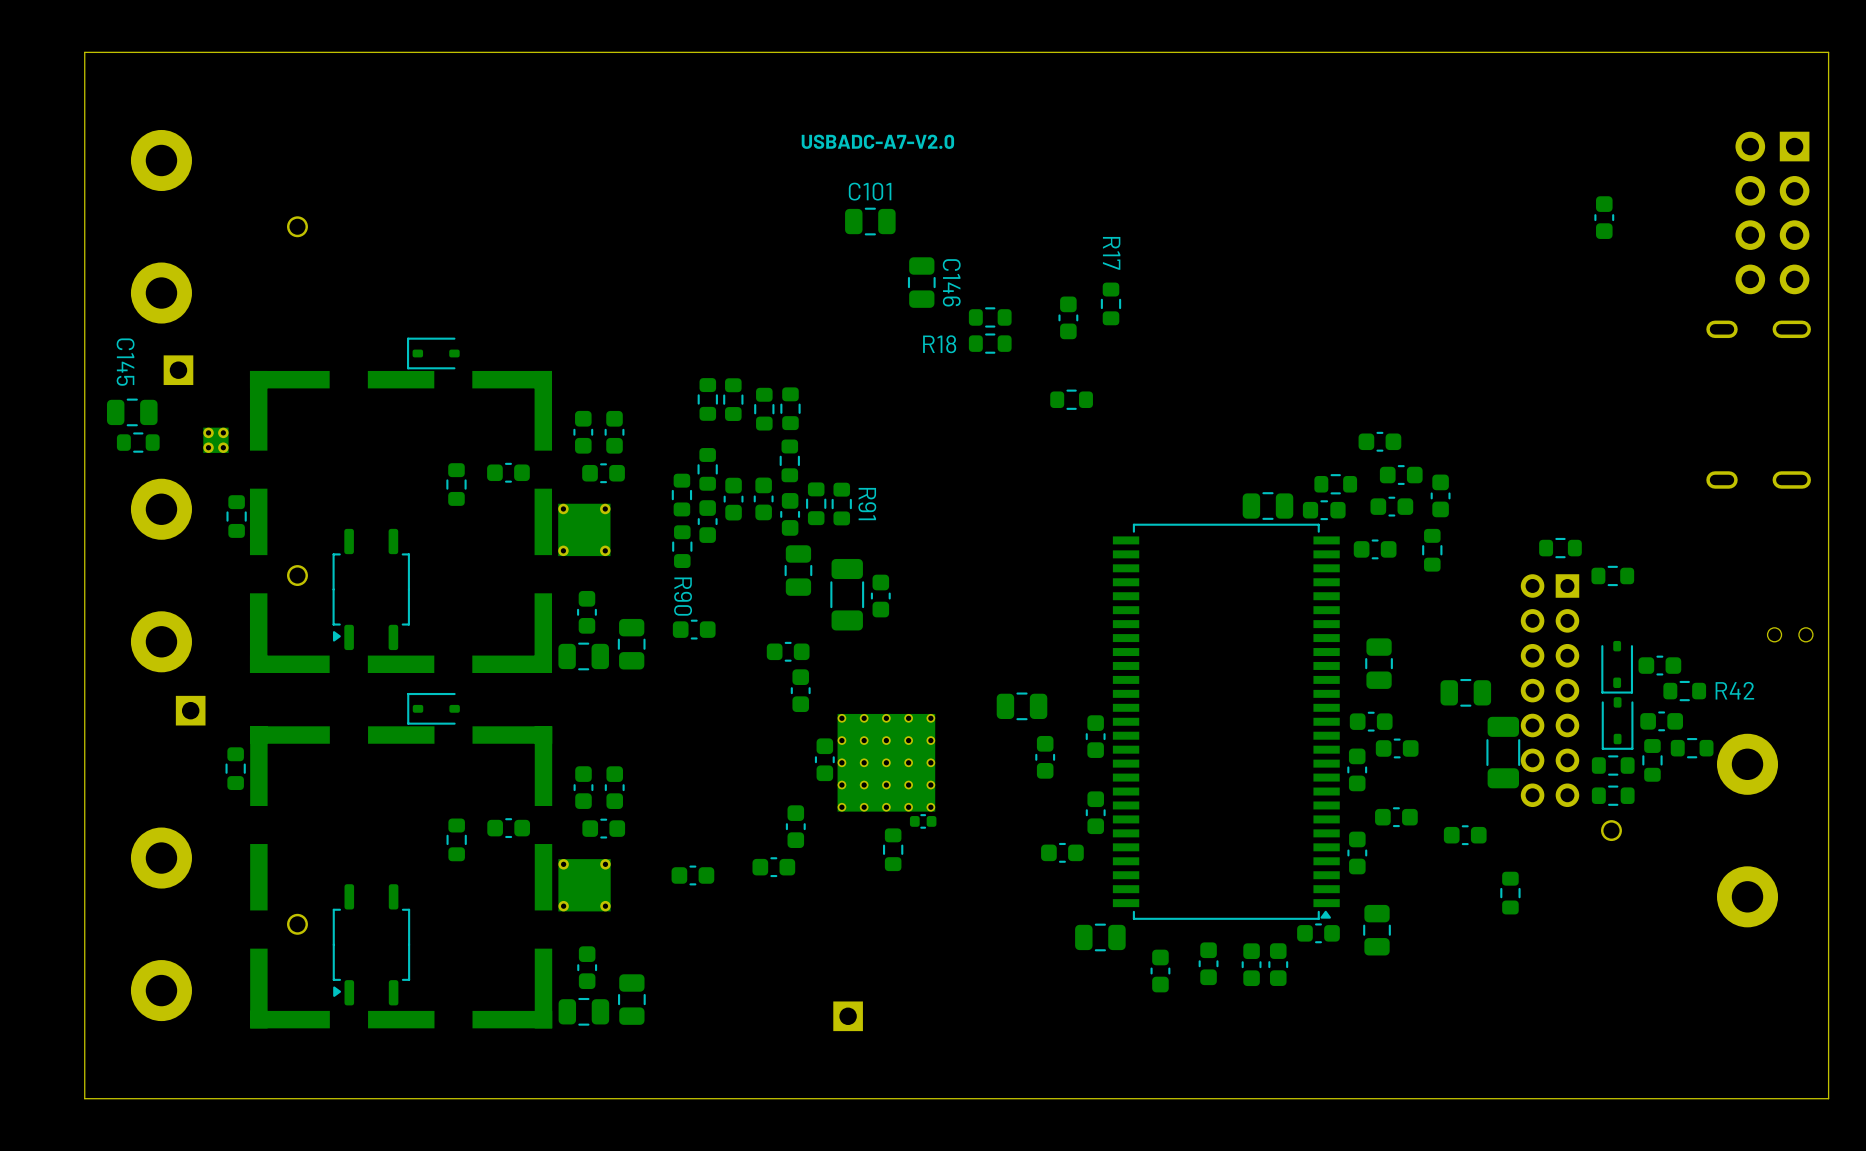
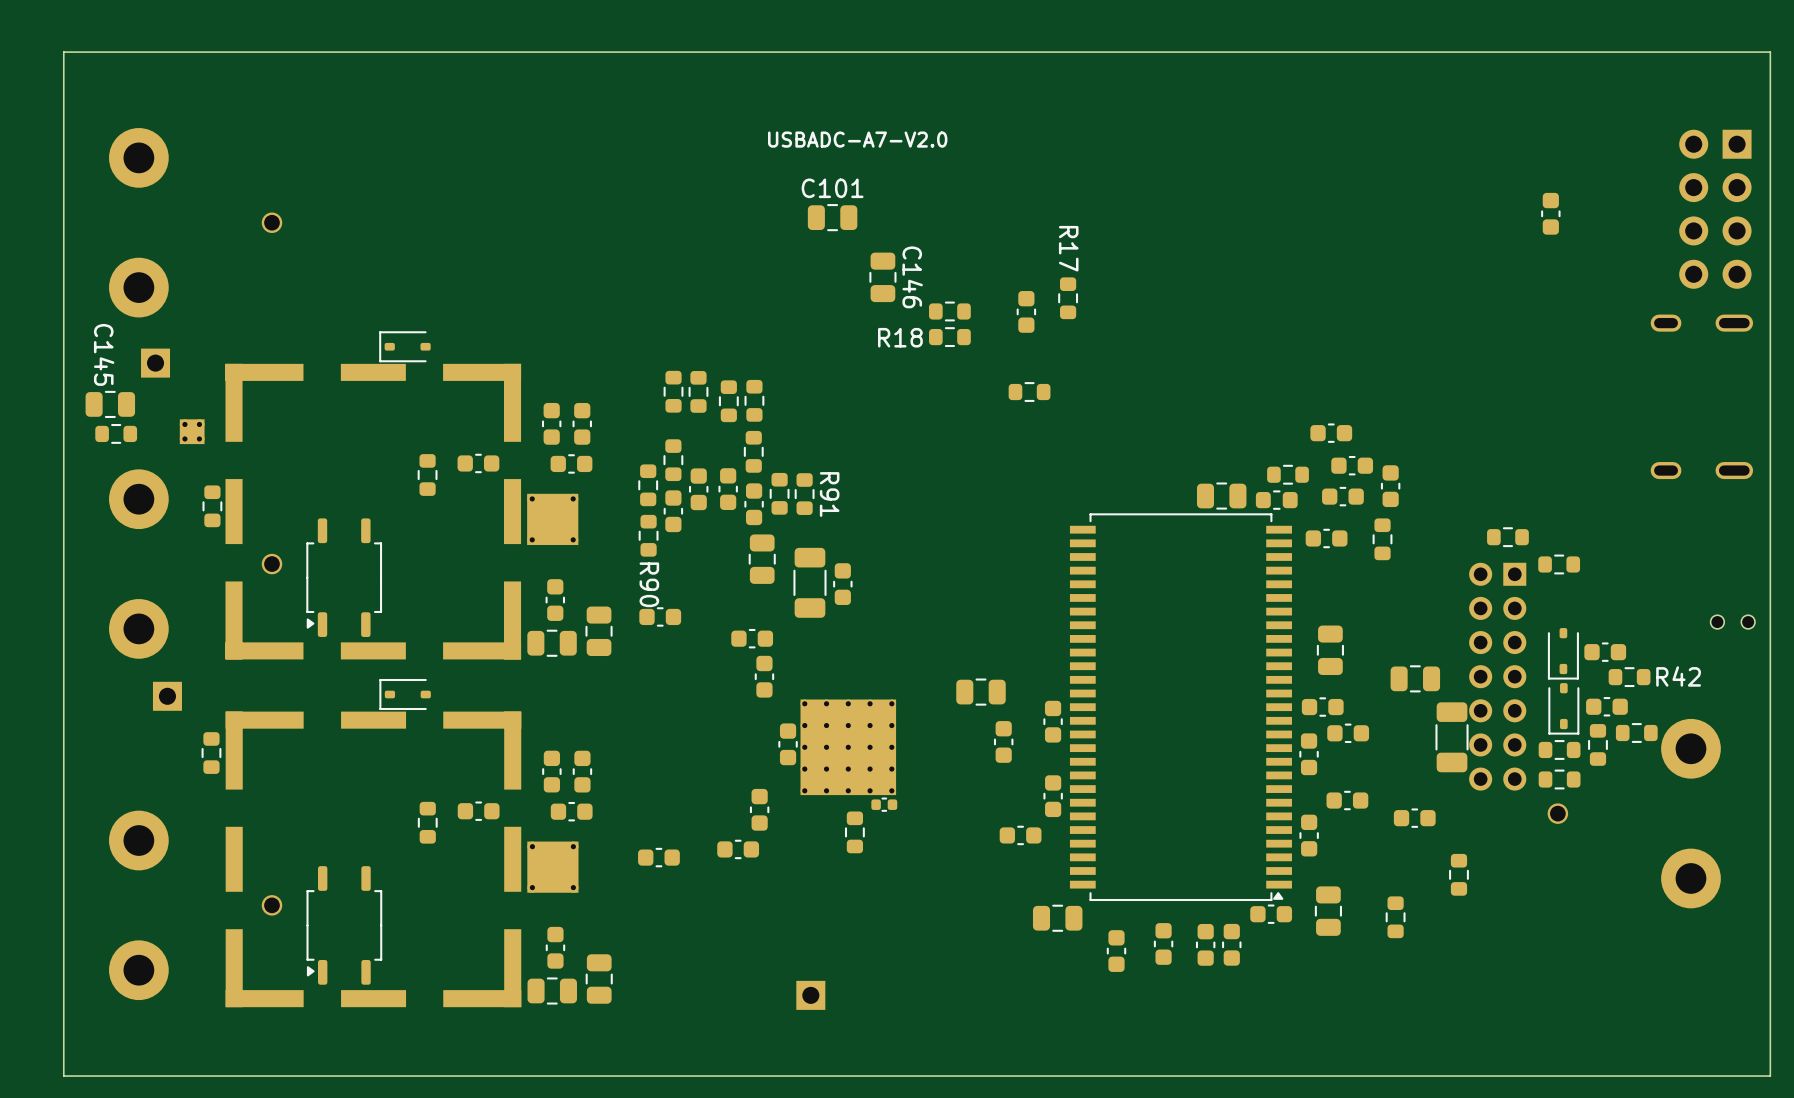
part: none -> (1395, 917)

